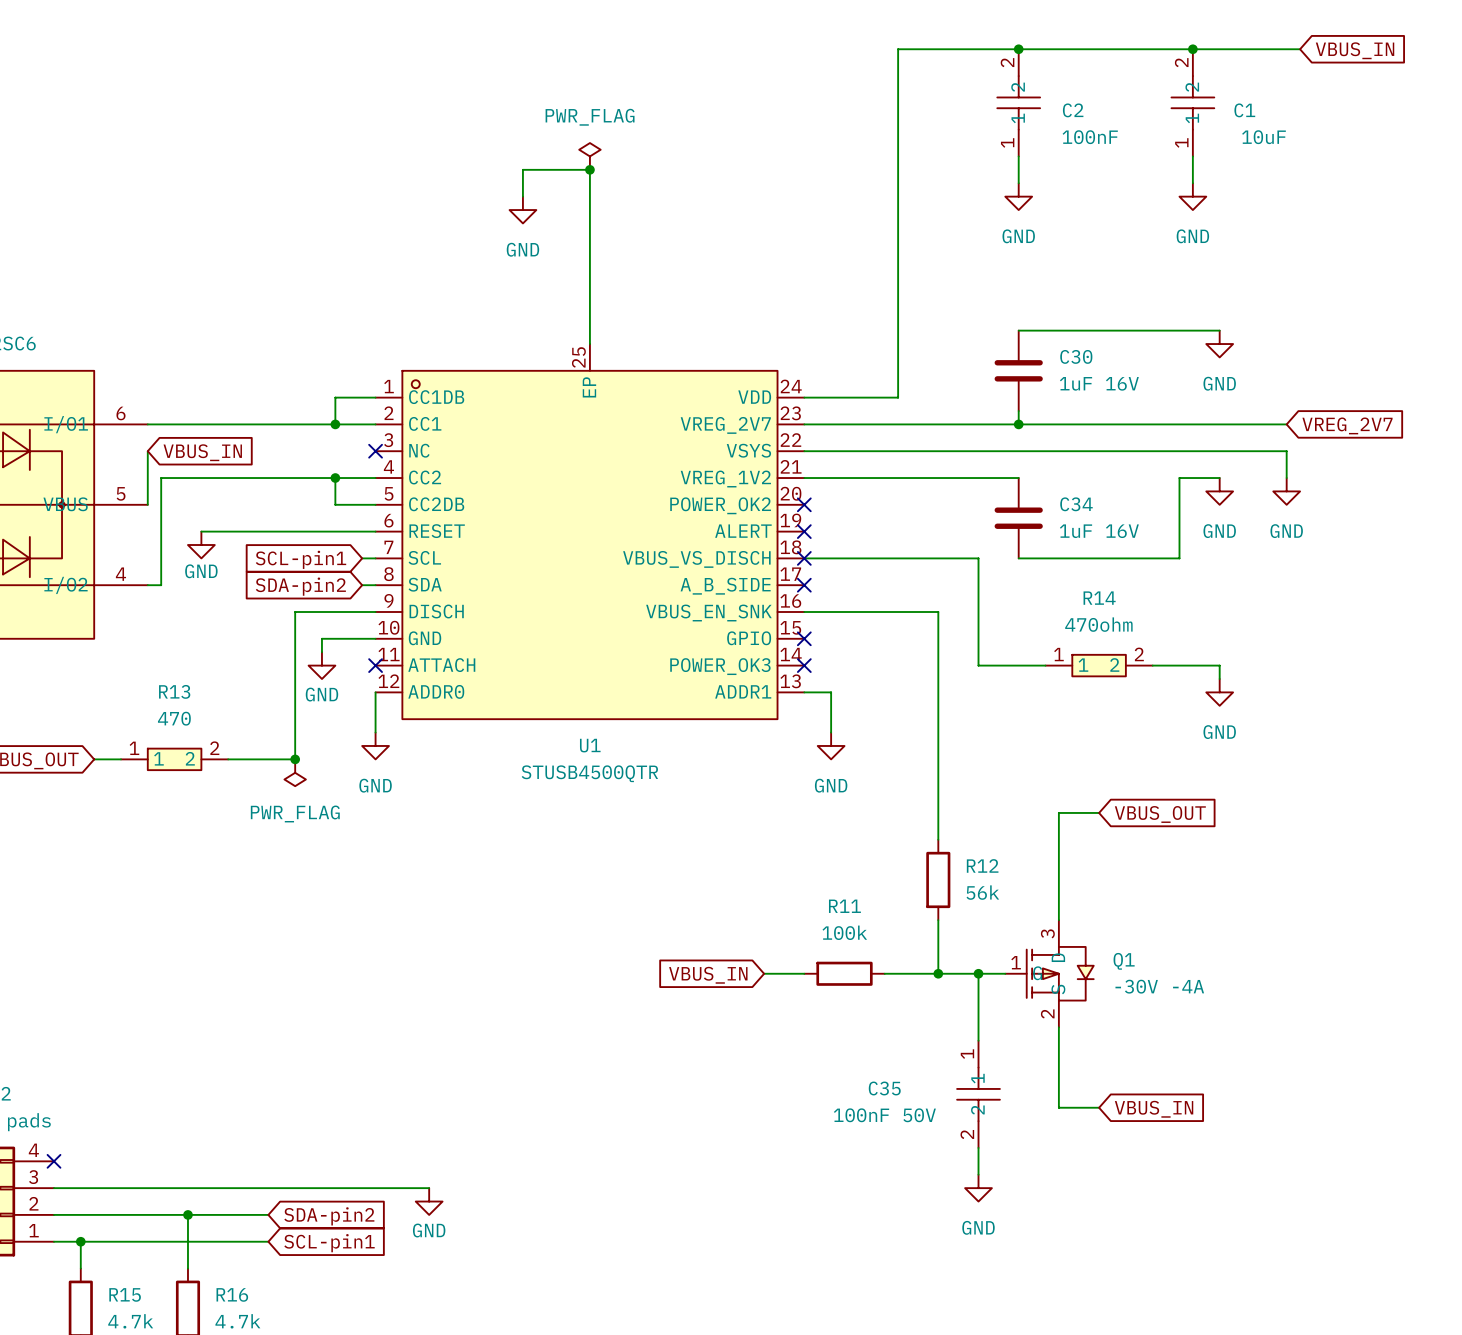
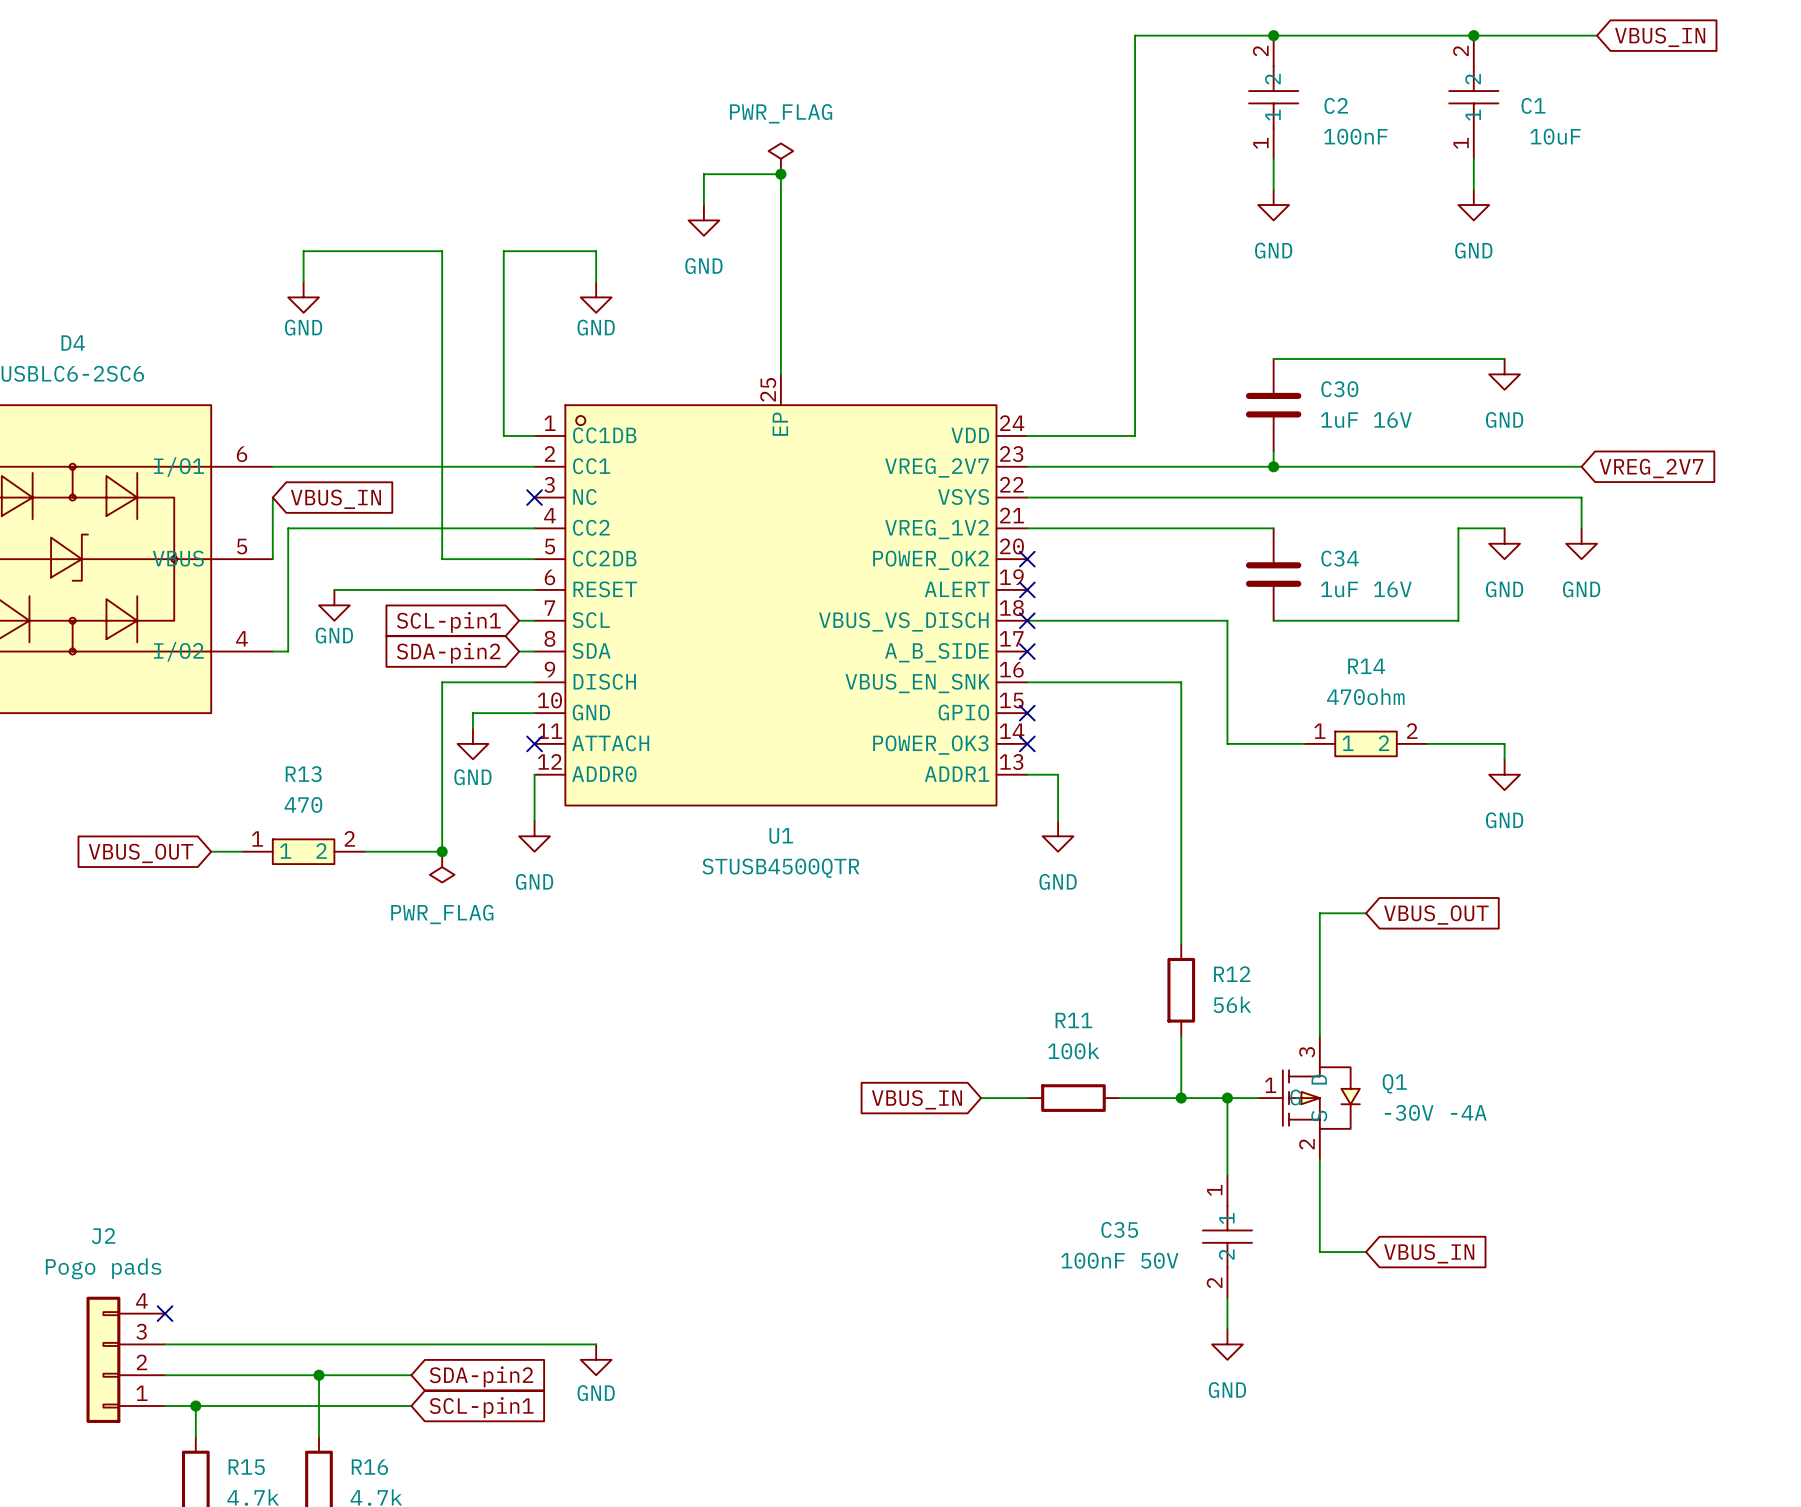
power symbol: none -> GND (303, 297)
power symbol: none -> GND (596, 297)
wire: (348, 397) (335, 397) (335, 424) -> (503, 435) (503, 251) (596, 251) (596, 282)
junction: (335, 424) -> none
wire: (335, 478) (335, 504) -> (303, 282) (303, 251) (442, 251) (442, 559) (488, 559)
junction: (335, 478) -> none

